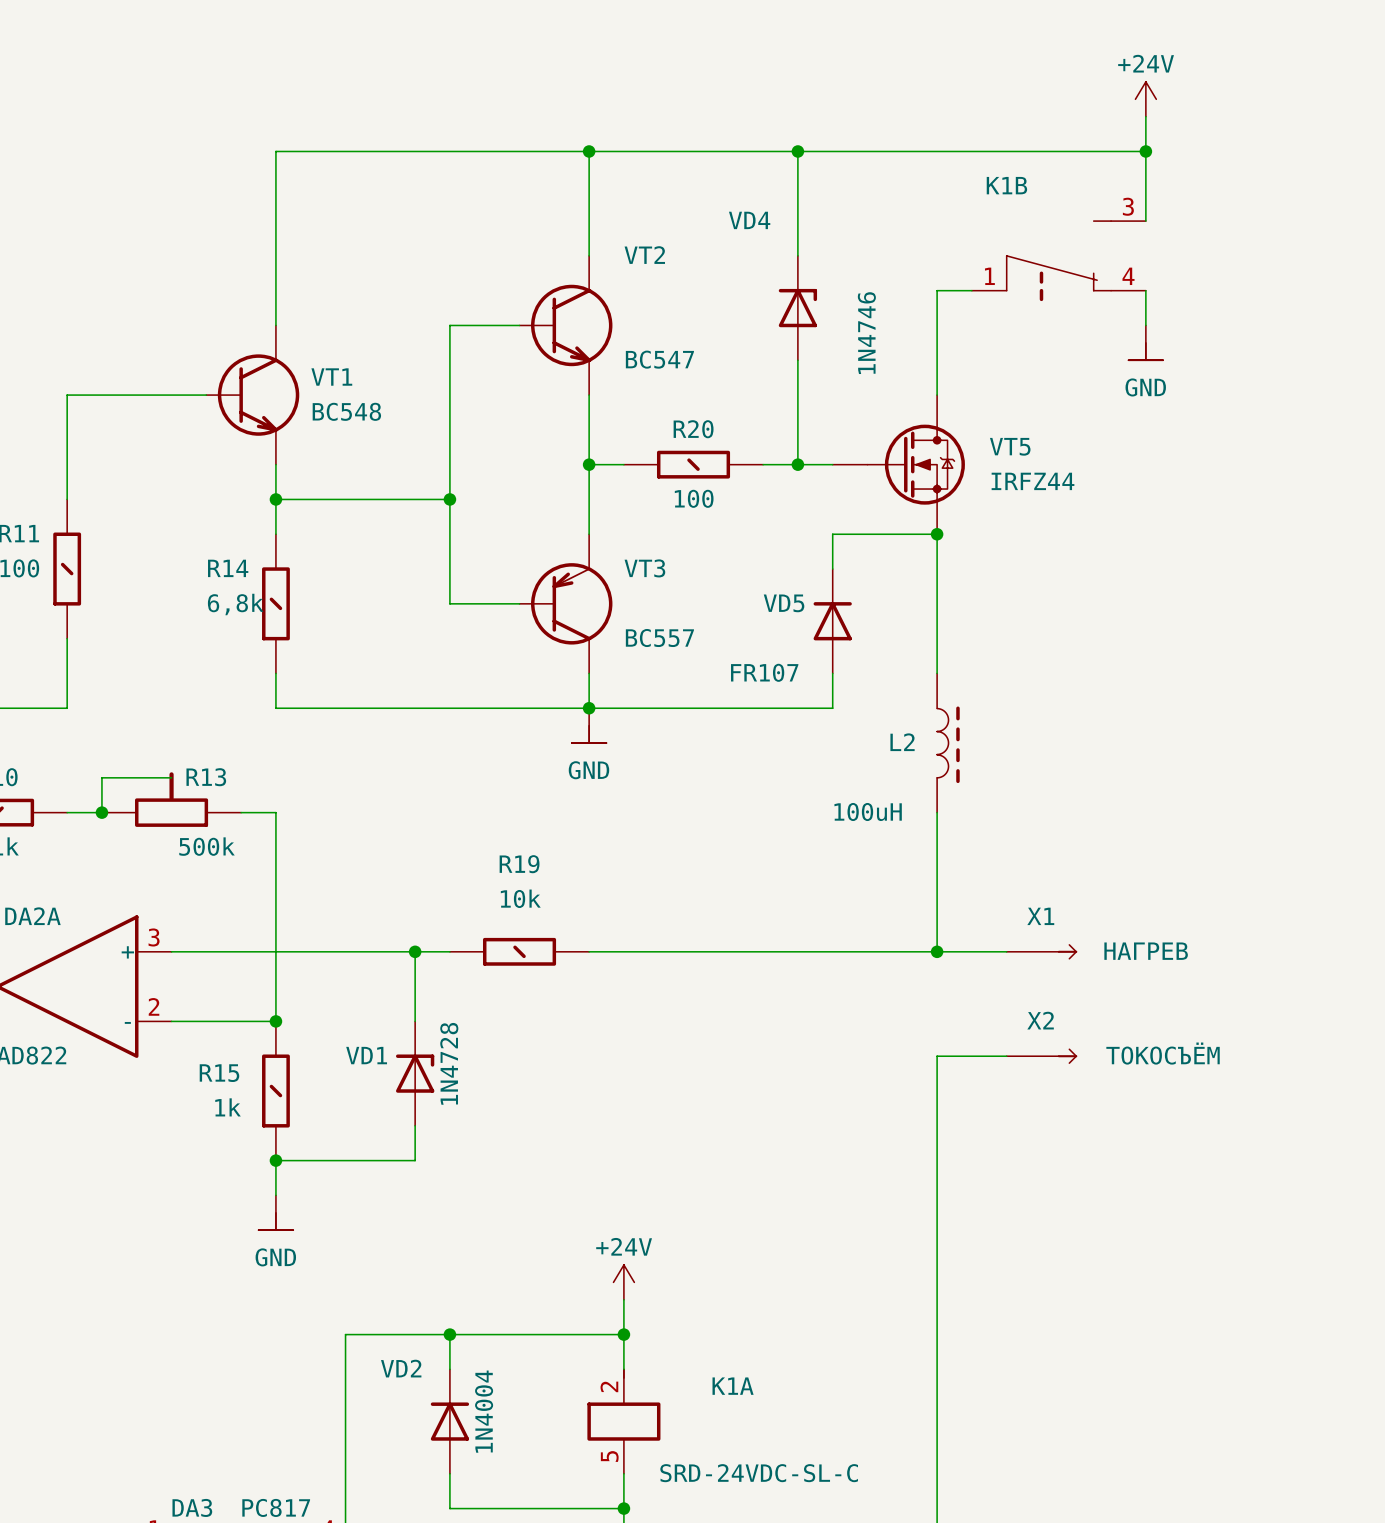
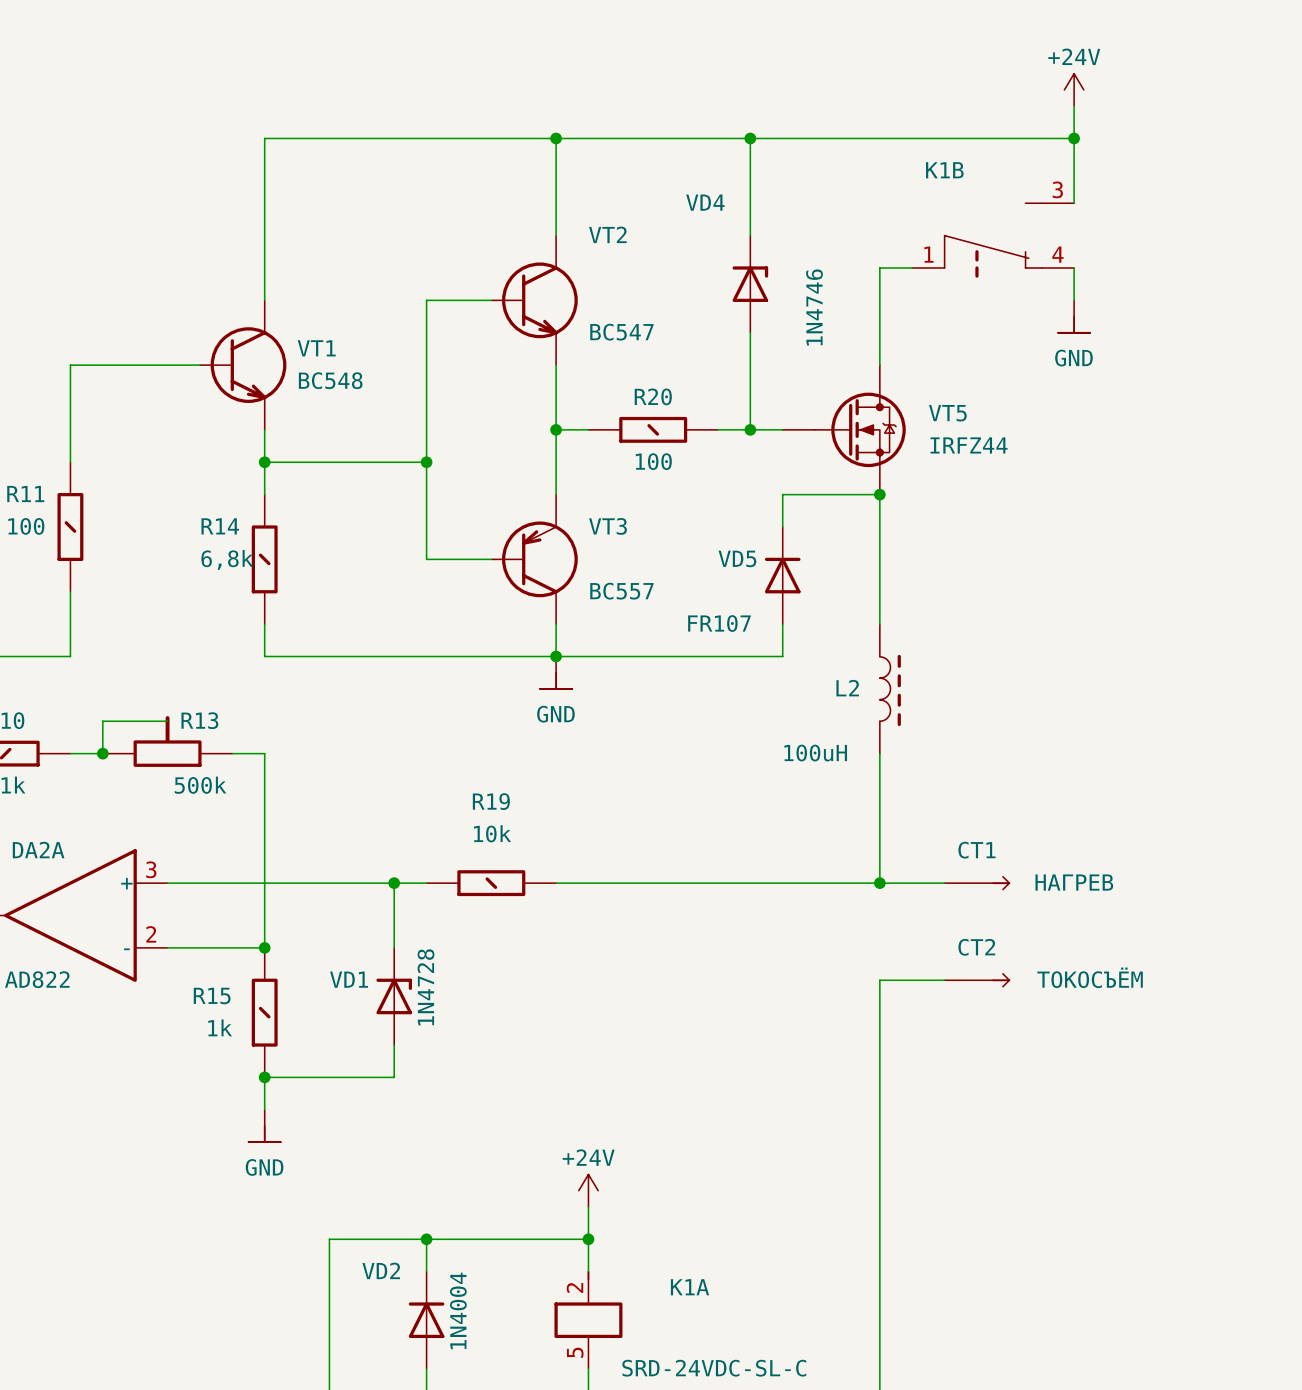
X1 name: X1 (1040, 916) -> СТ1 (976, 850)
X2 name: X2 (1040, 1020) -> СТ2 (976, 947)

